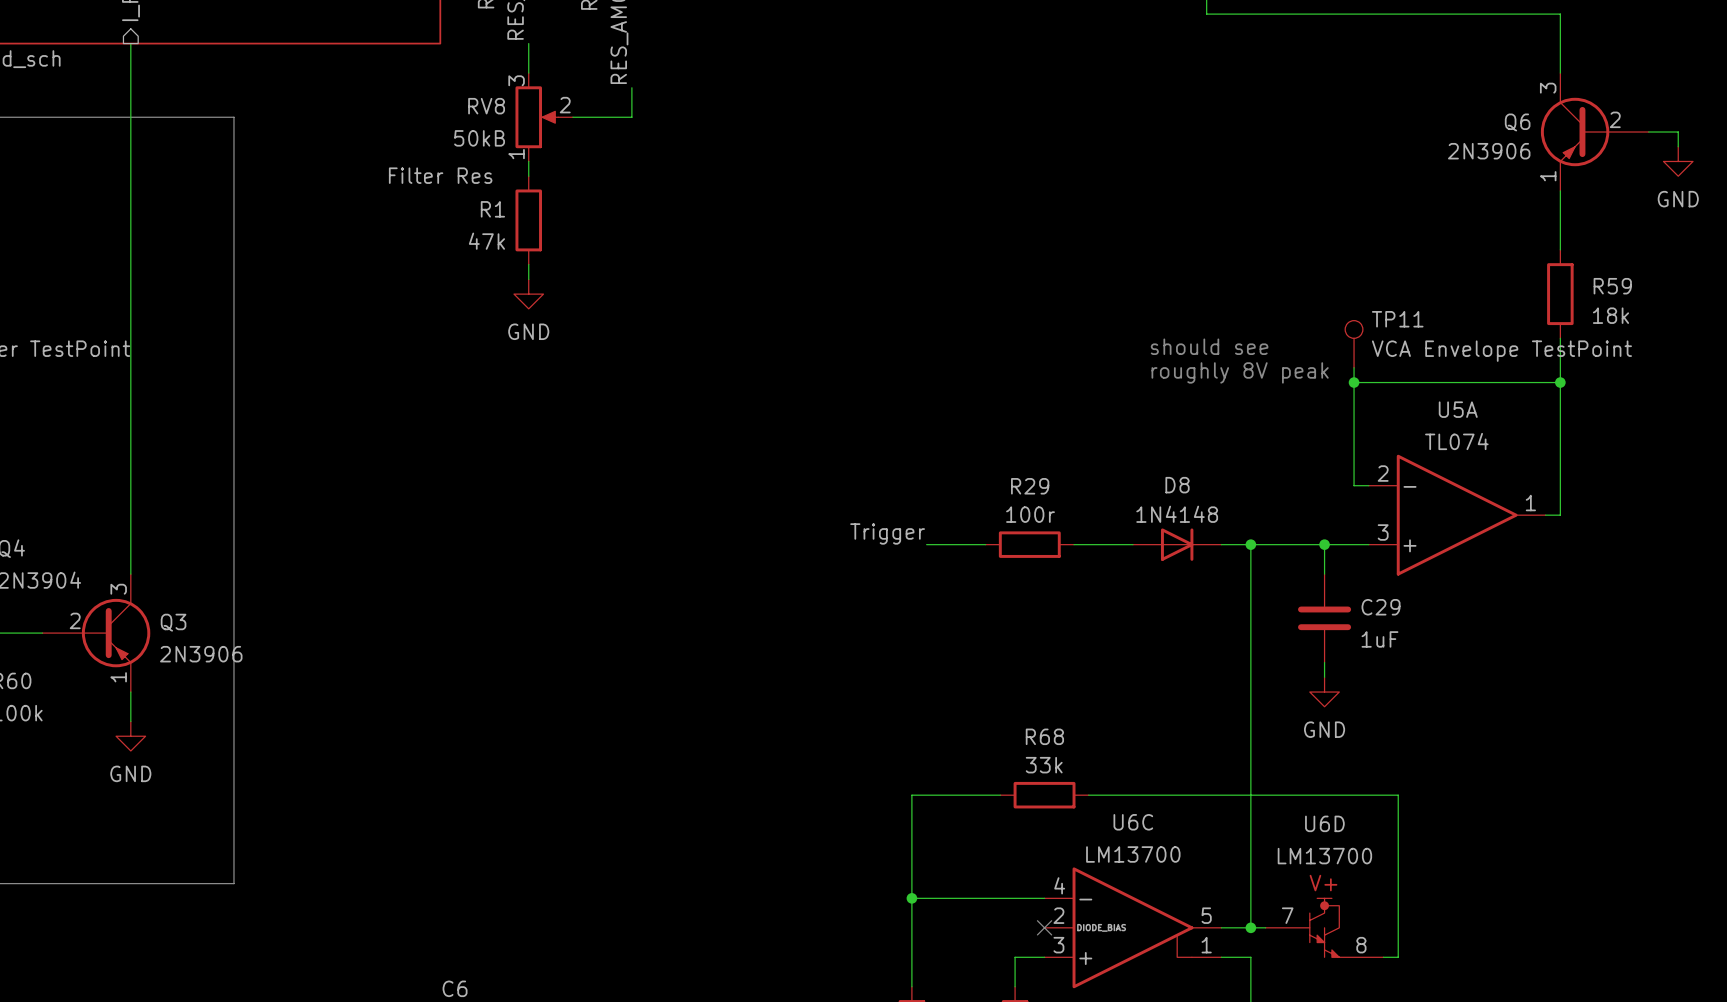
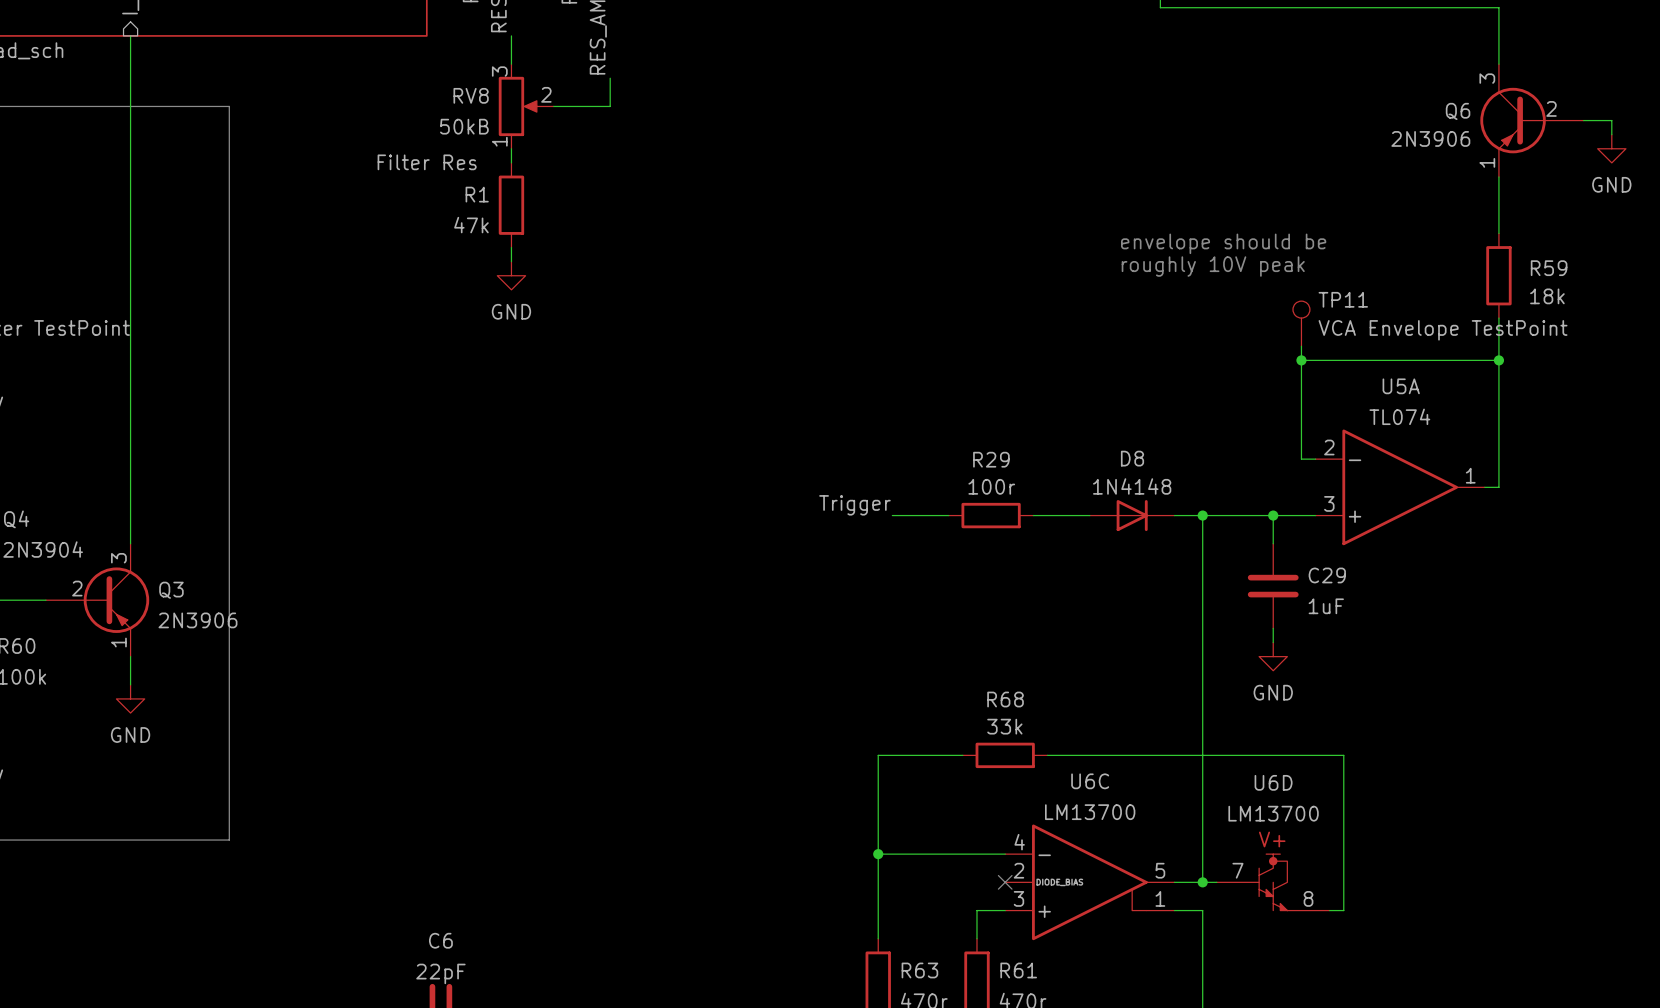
text: none -> envelope should be (1223, 243)
text: none -> roughly 10V peak (1213, 266)
text: should see (1209, 346) -> none
text: roughly 8V peak (1240, 372) -> none

